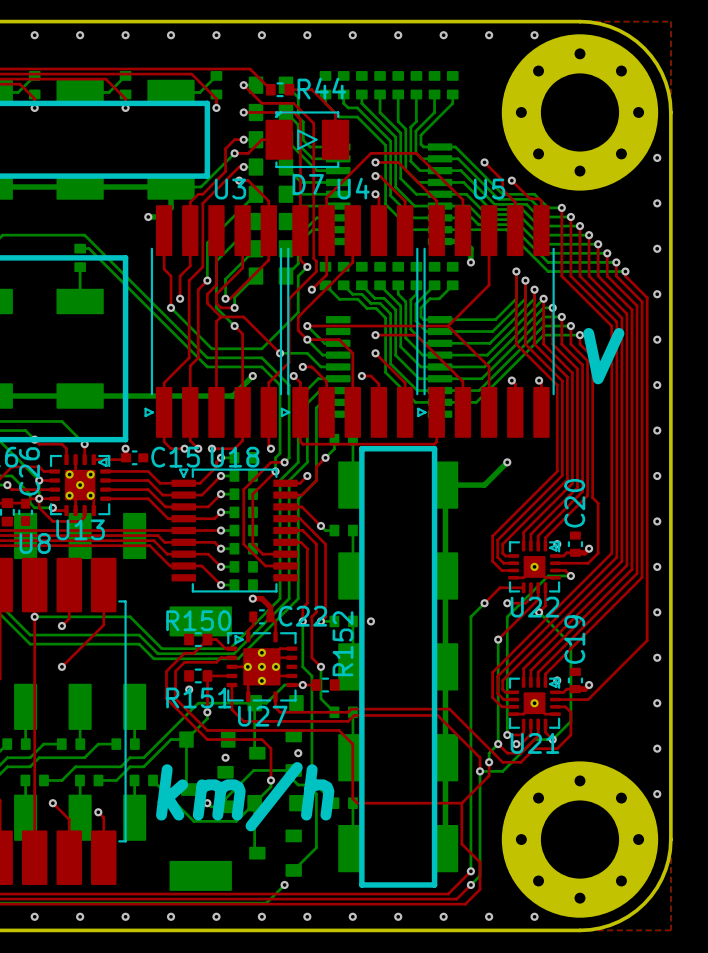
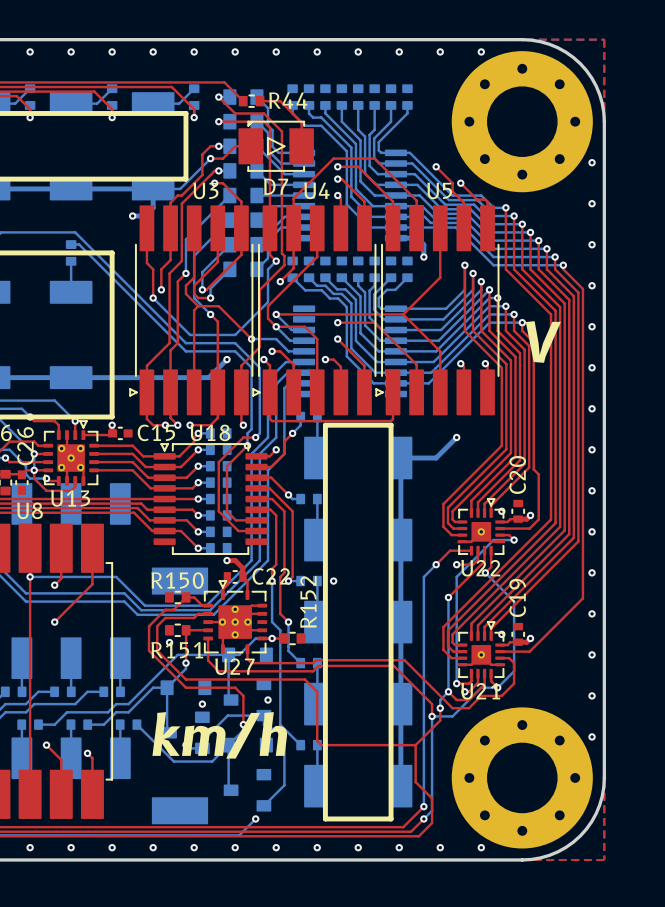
U13 footprint: [49, 454, 112, 516] -> [43, 420, 100, 486]
U22 footprint: [508, 540, 561, 594] -> [457, 498, 506, 556]
U27 footprint: [226, 631, 298, 703] -> [203, 580, 268, 655]
U21 footprint: [508, 676, 561, 730] -> [457, 621, 506, 679]

